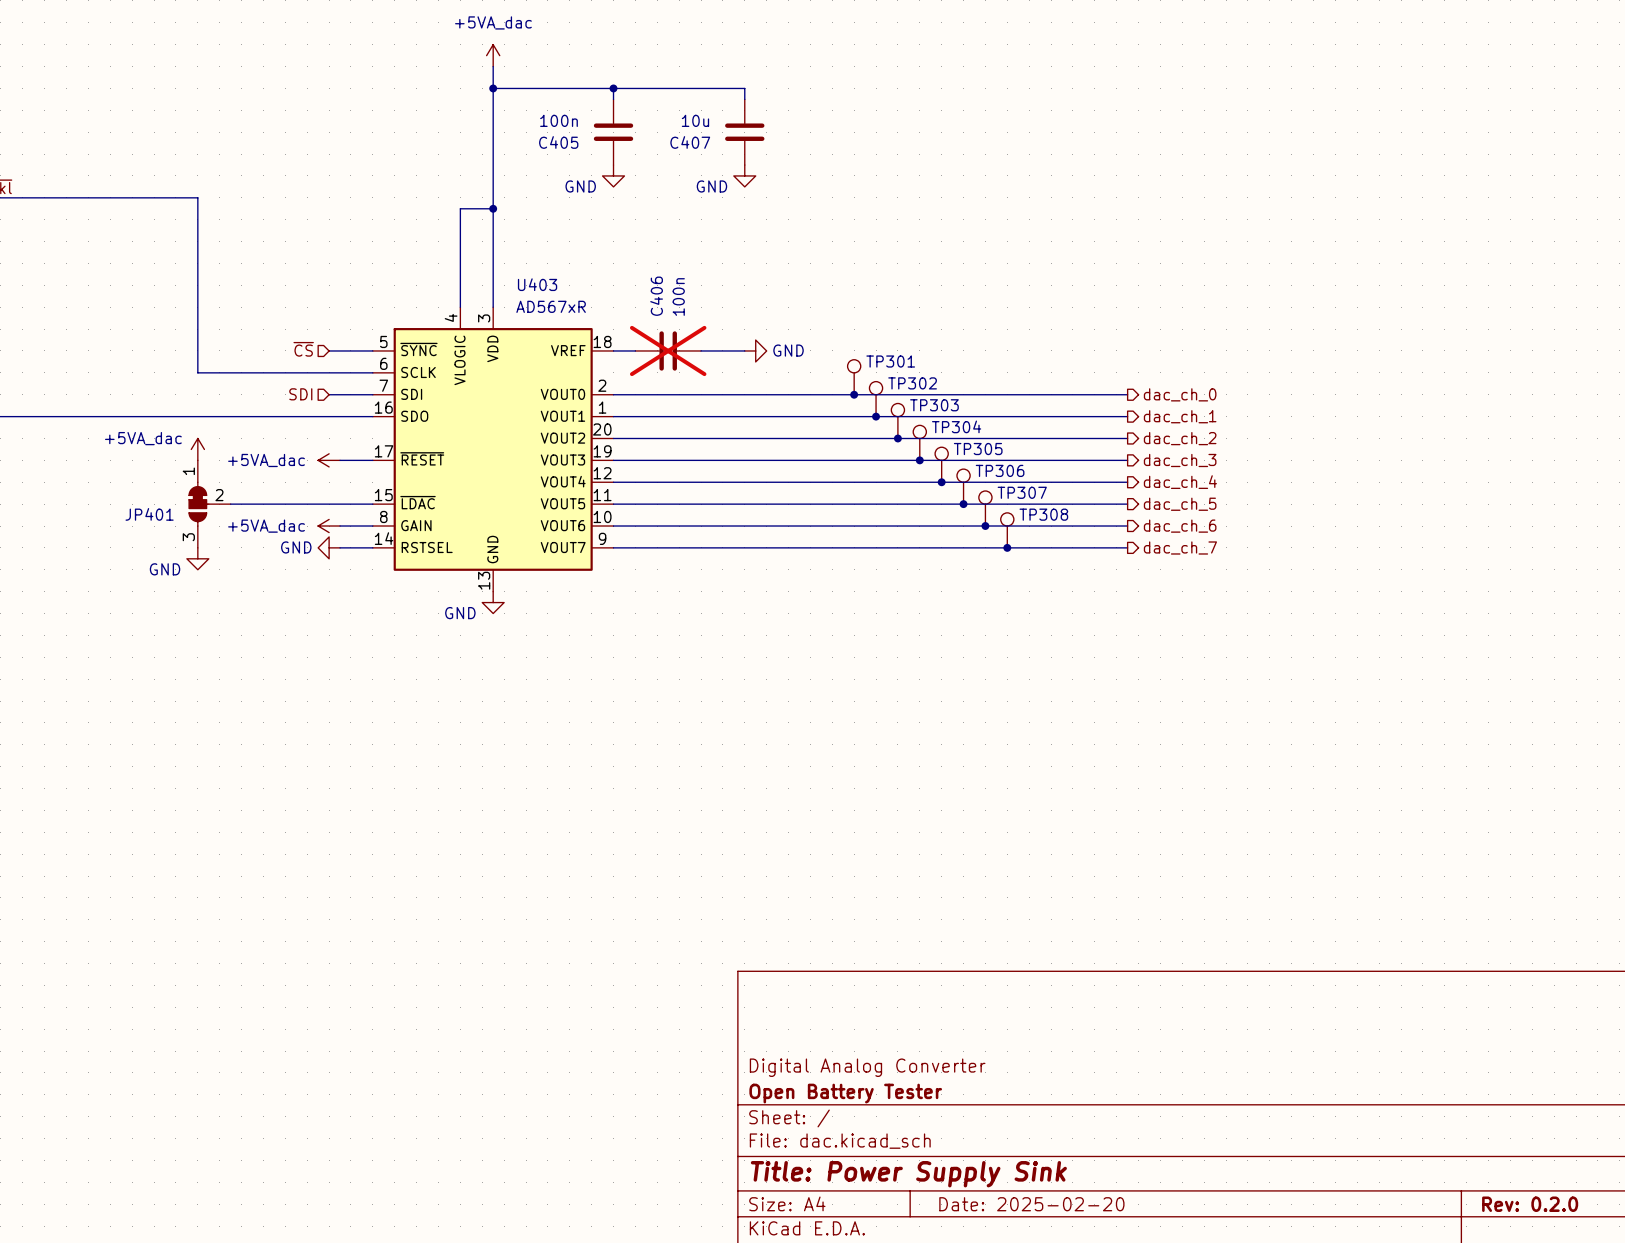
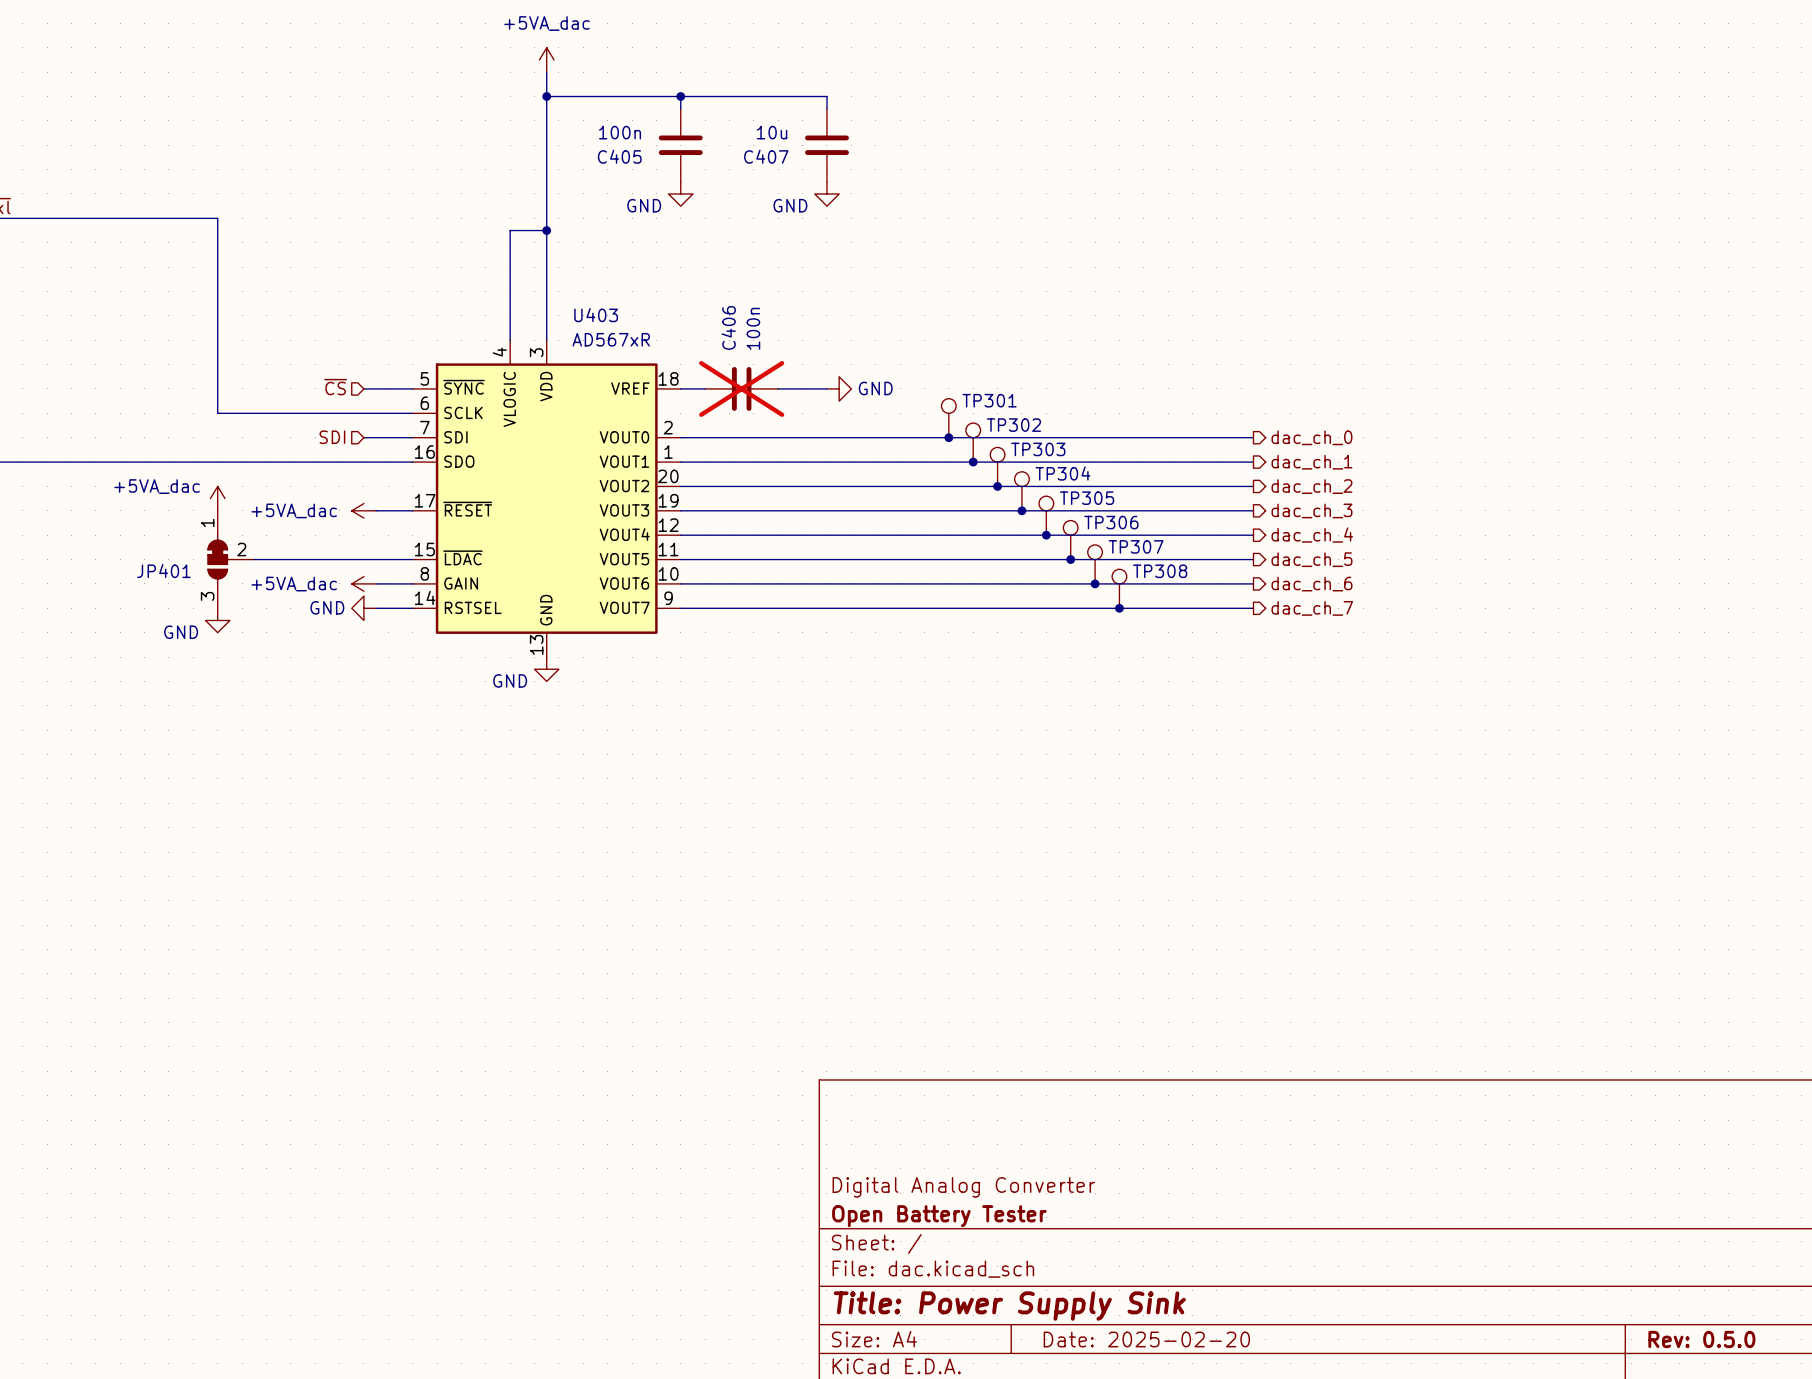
title block: Rev: 0.2.0 (1530, 1204) -> Rev: 0.5.0 (1701, 1339)

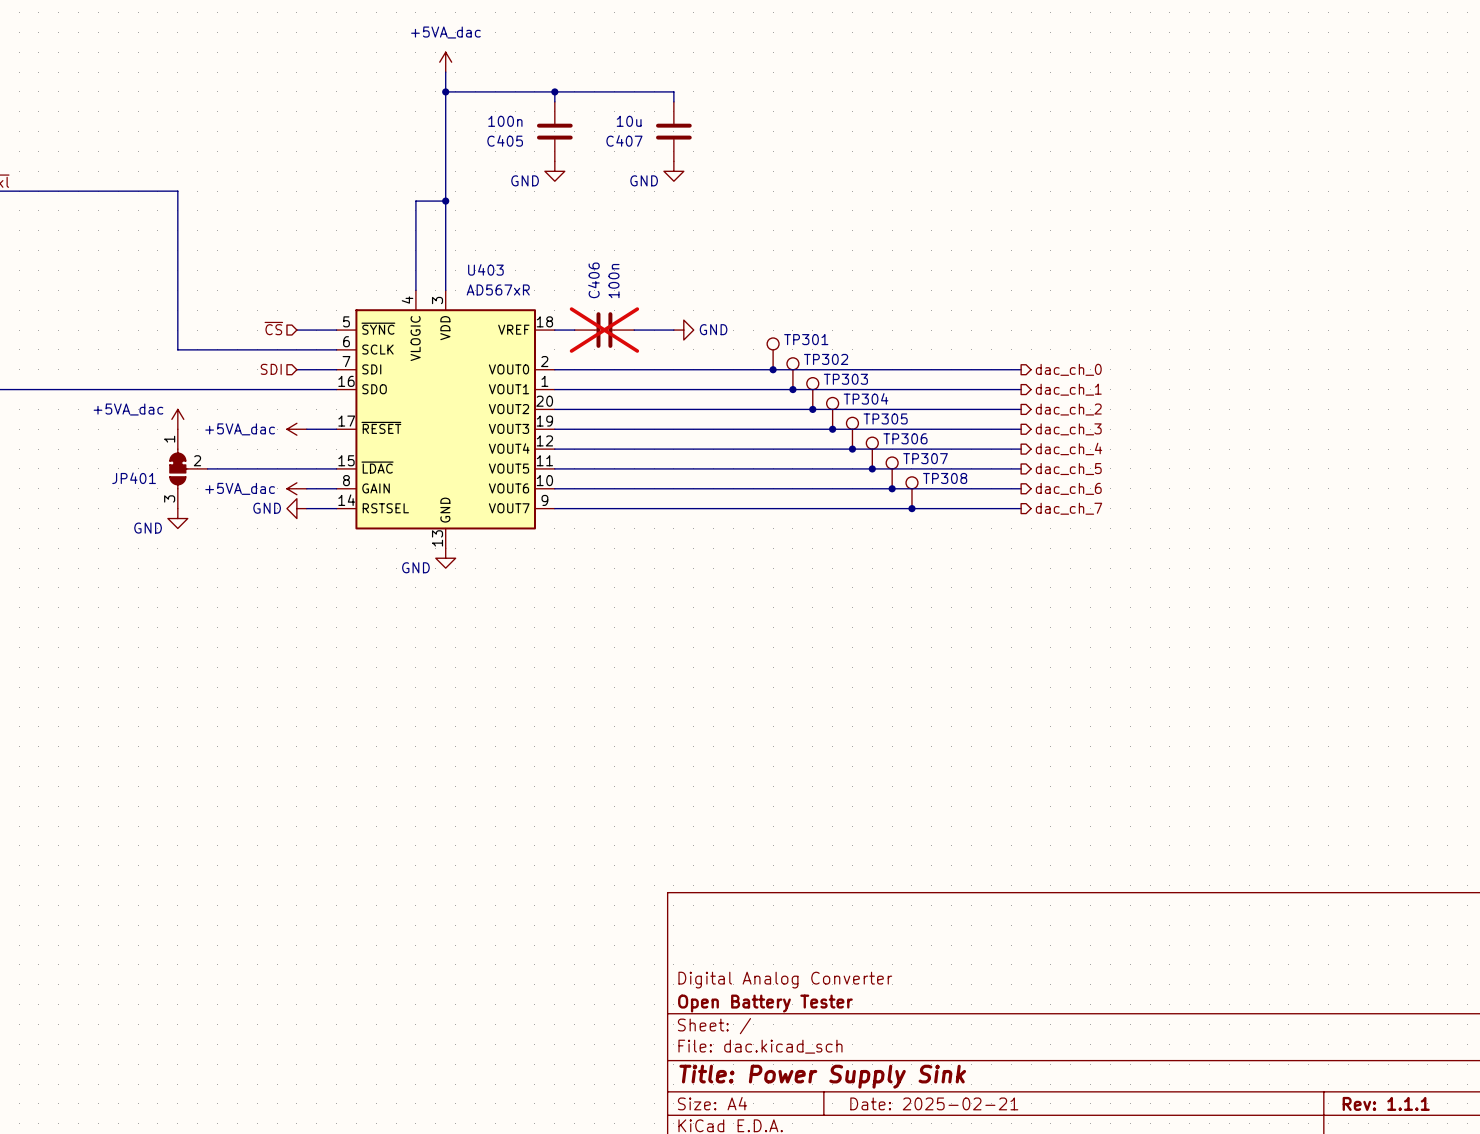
title block: Date: 2025-02-20 (1146, 1339) -> Date: 2025-02-21 (934, 1103)
title block: Rev: 0.5.0 (1701, 1339) -> Rev: 1.1.1 (1386, 1103)

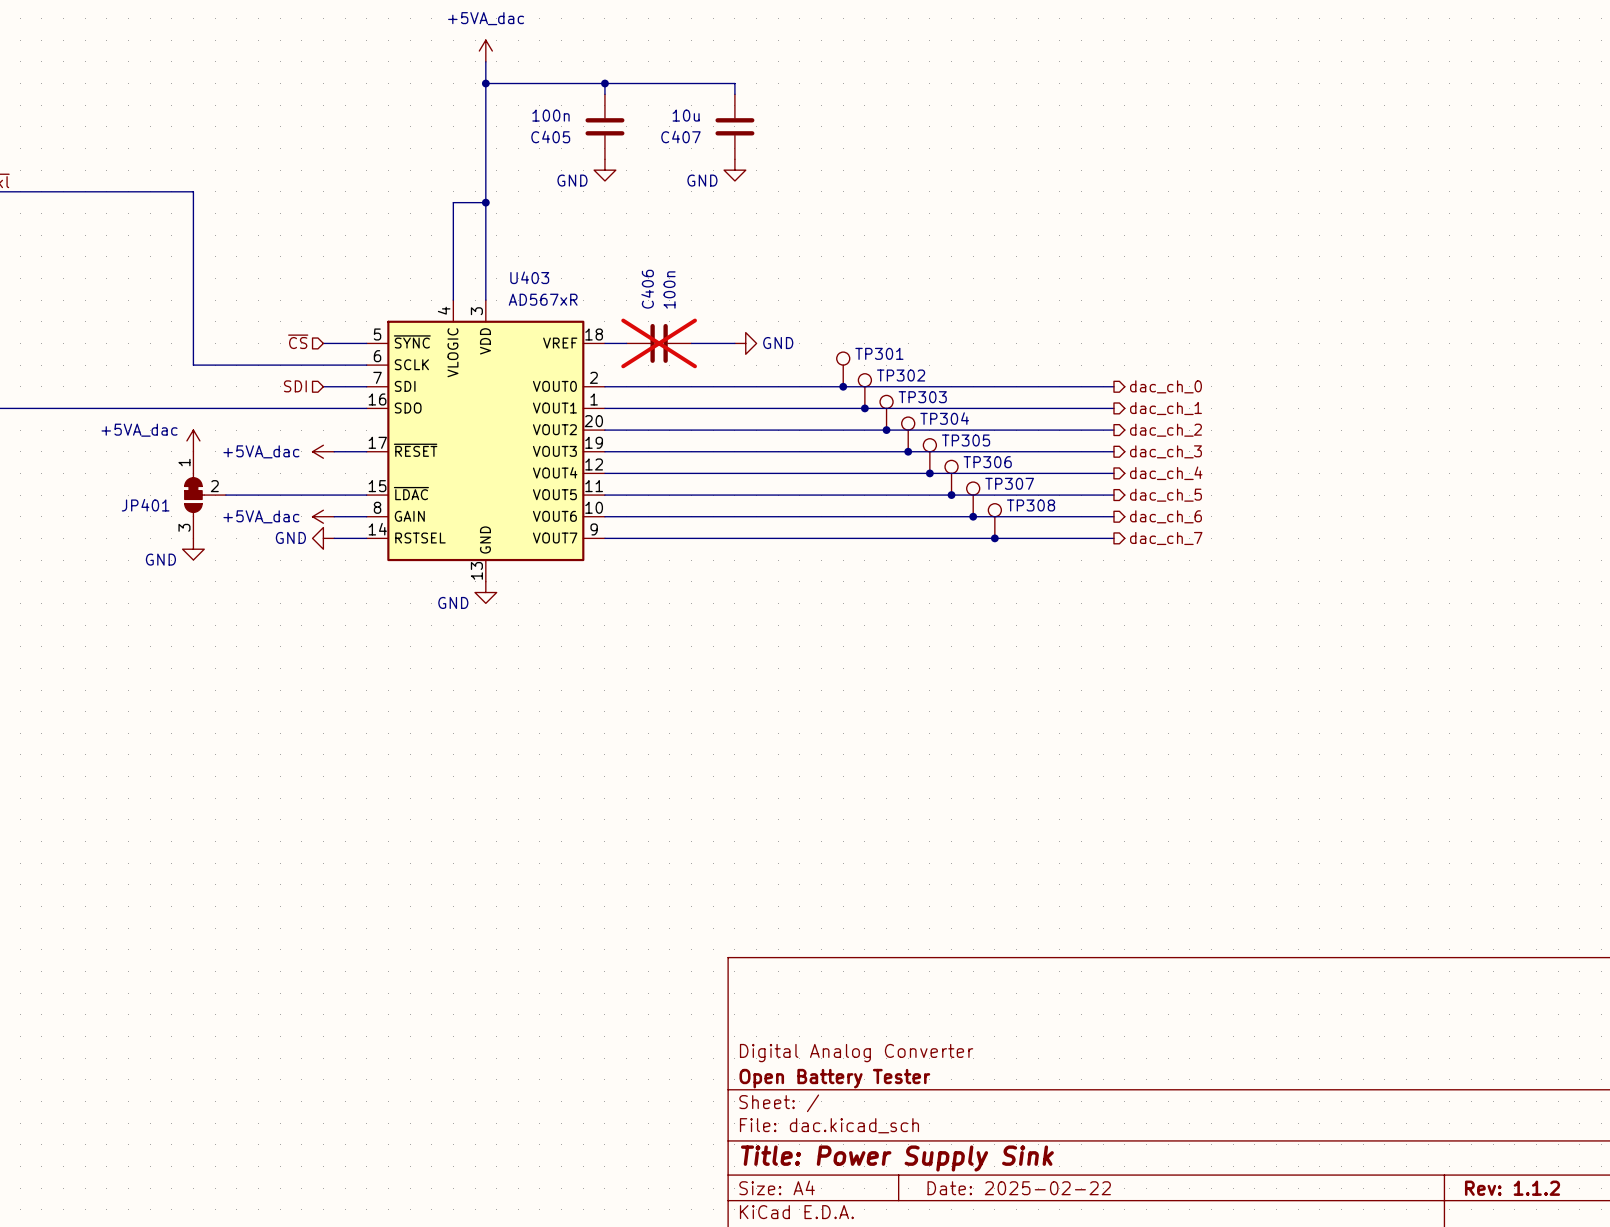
title block: Date: 2025-02-21 (934, 1103) -> Date: 2025-02-22 (1019, 1188)
title block: Rev: 1.1.1 (1386, 1103) -> Rev: 1.1.2 (1512, 1188)

